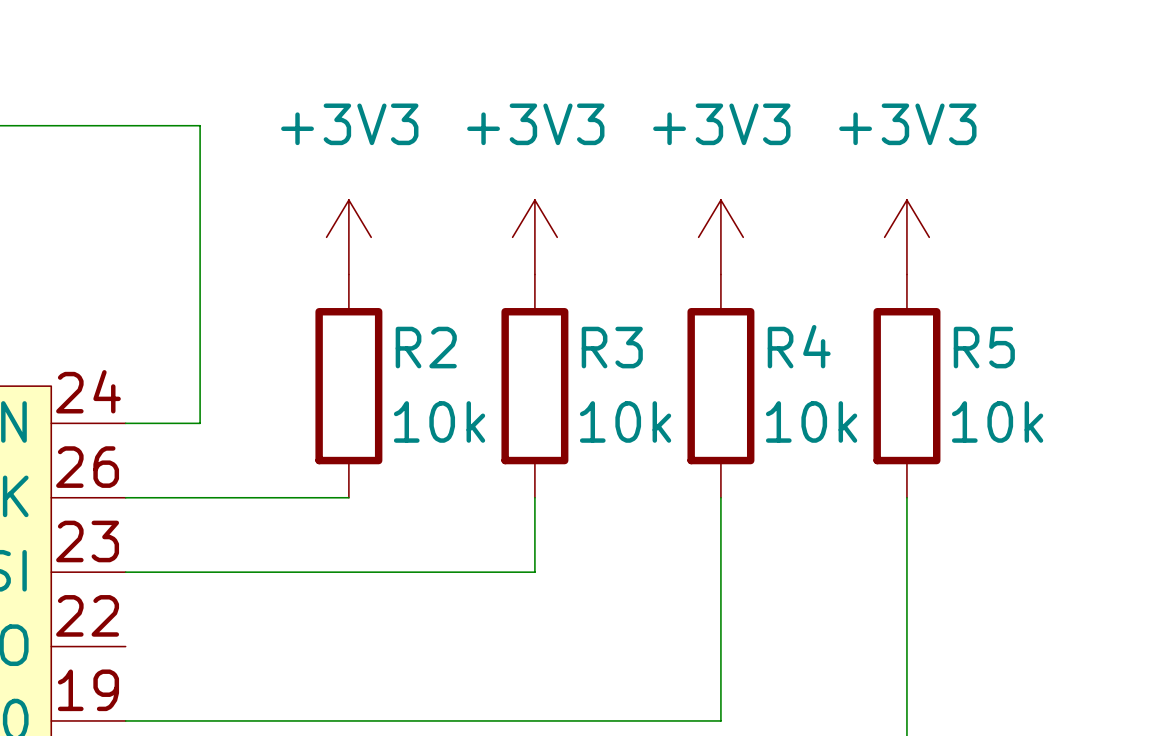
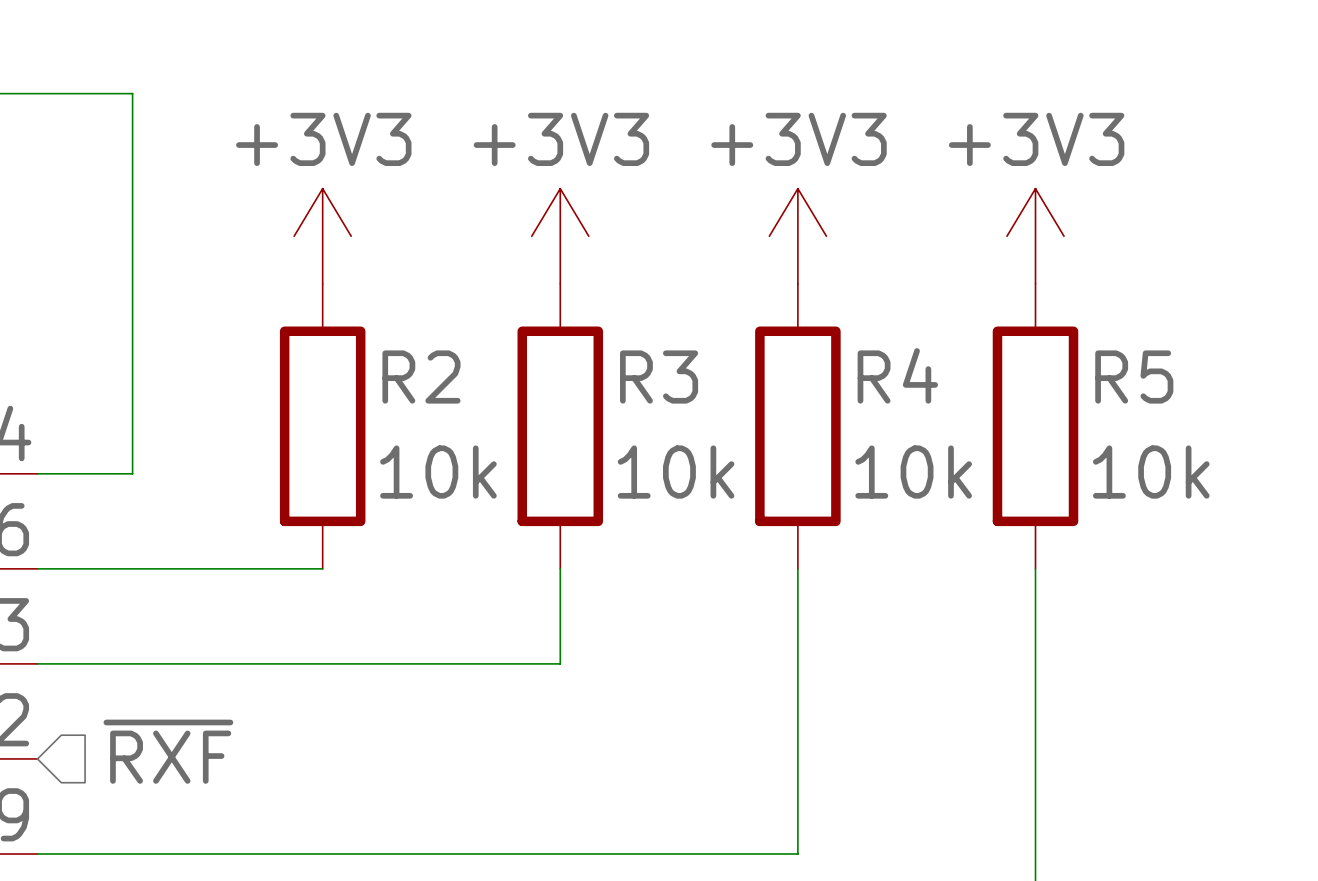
power symbol text position: +3V3 (349, 124) -> +3V3 (323, 139)
power symbol text position: +3V3 (535, 124) -> +3V3 (561, 139)
power symbol text position: +3V3 (721, 124) -> +3V3 (799, 139)
power symbol text position: +3V3 (907, 124) -> +3V3 (1036, 139)
hierarchical label: none -> ~{RXF} (168, 751)

